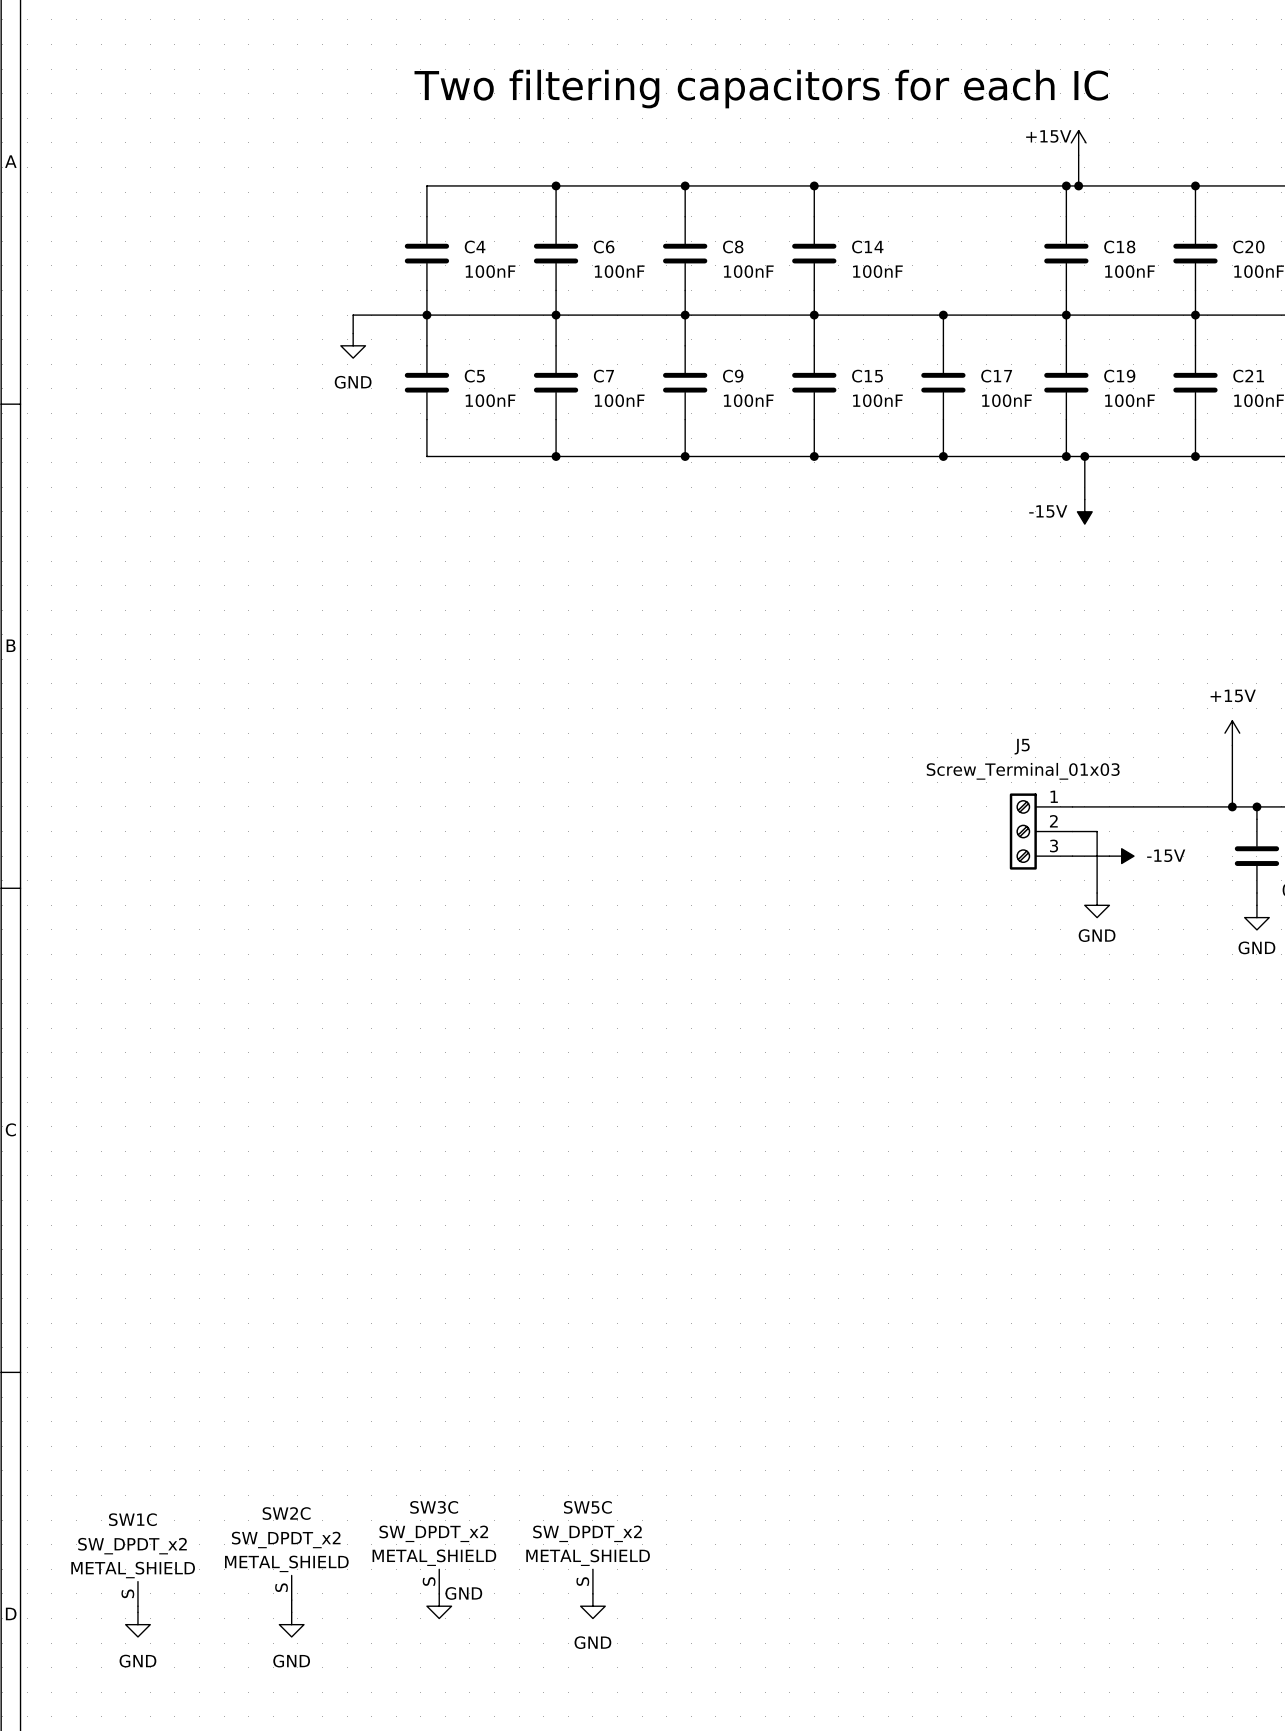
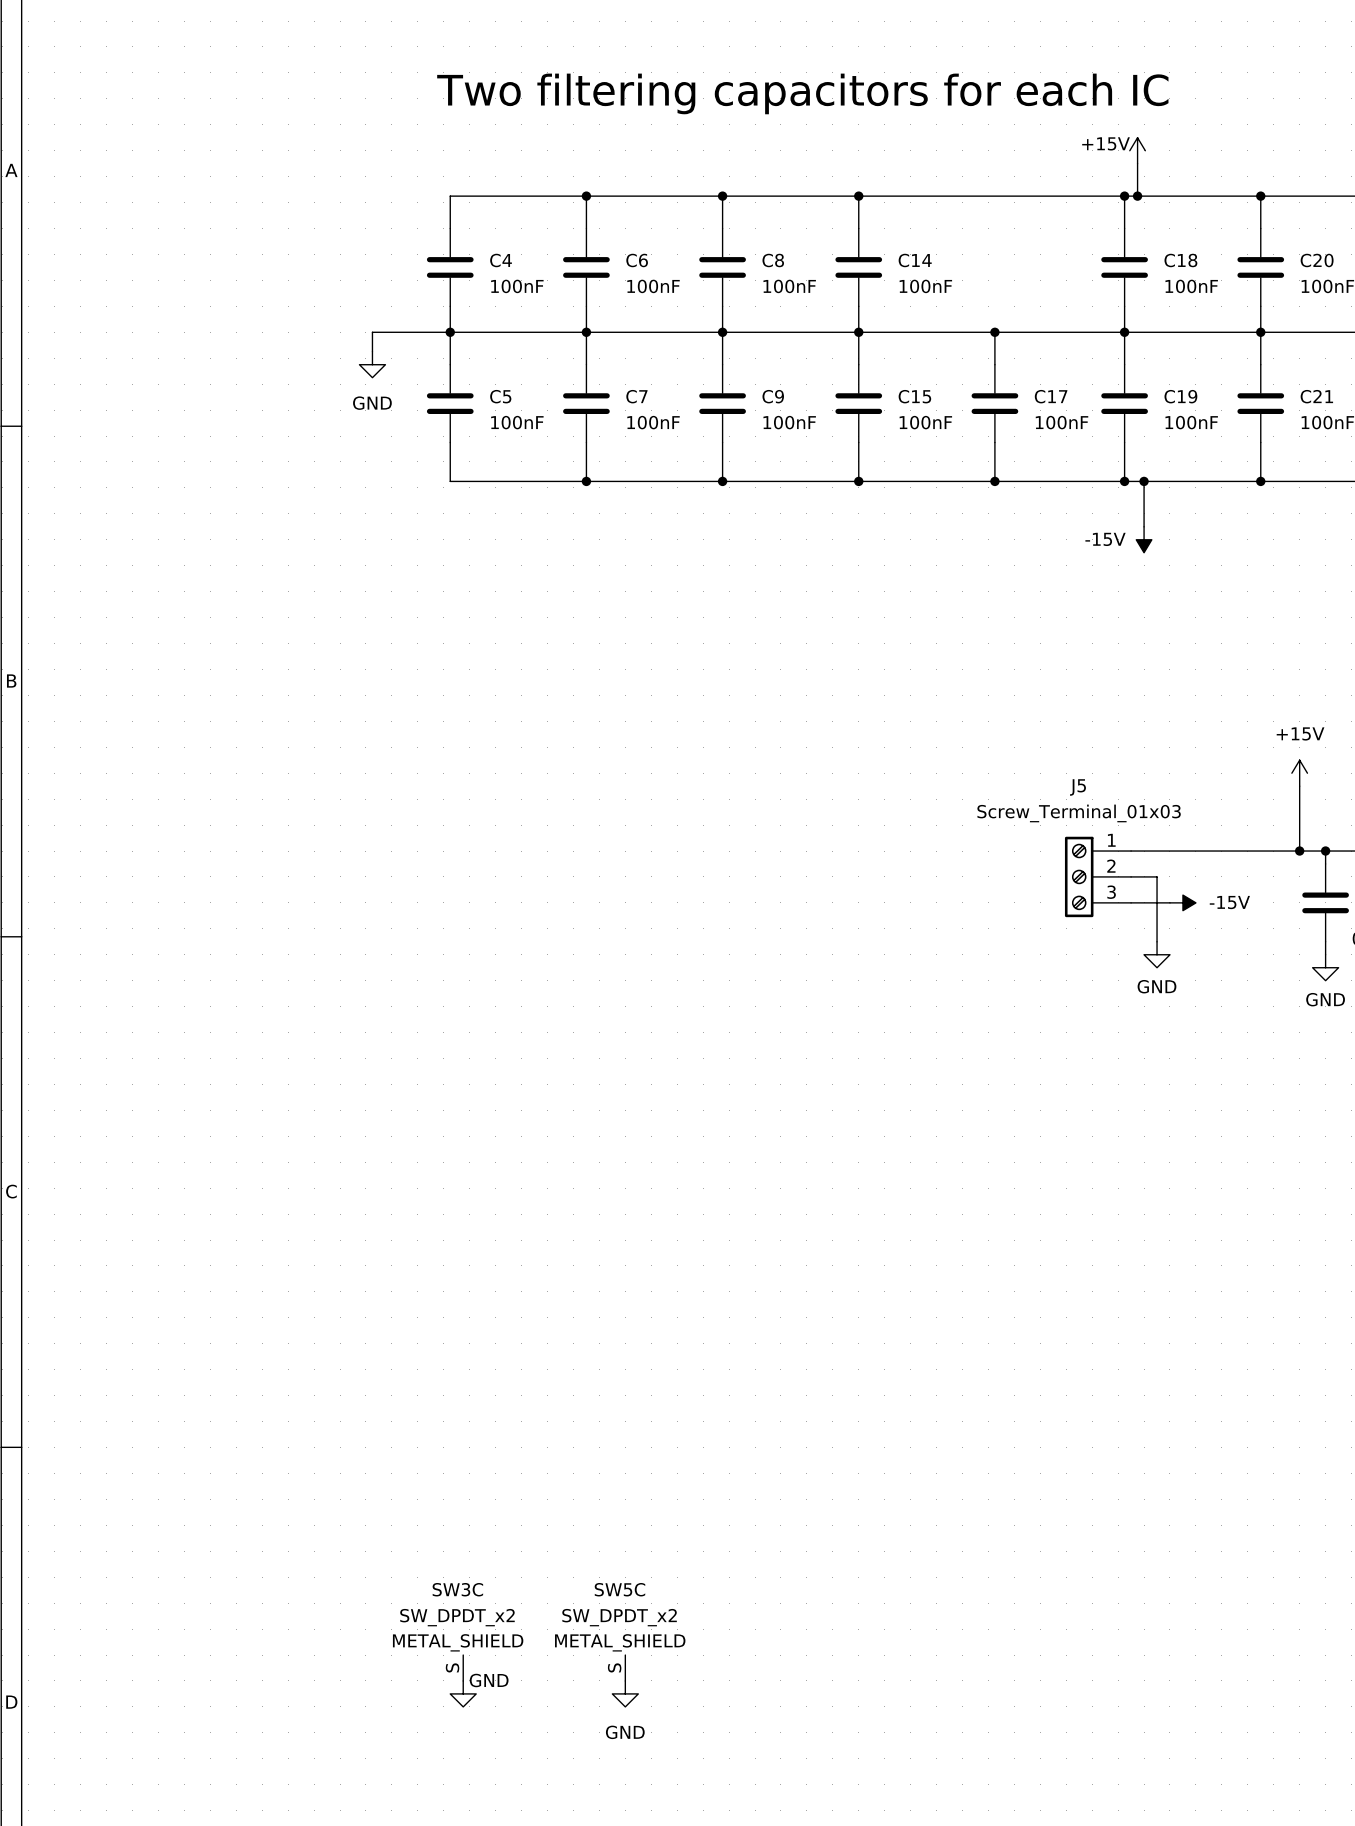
SW2C: SW_DPDT_x2 (291, 1587) -> none
SW1C: SW_DPDT_x2 (137, 1593) -> none
wire: (291, 1600) (291, 1612) -> none
wire: (137, 1606) (137, 1612) -> none
power symbol: GND (137, 1624) -> none
power symbol: GND (291, 1624) -> none

